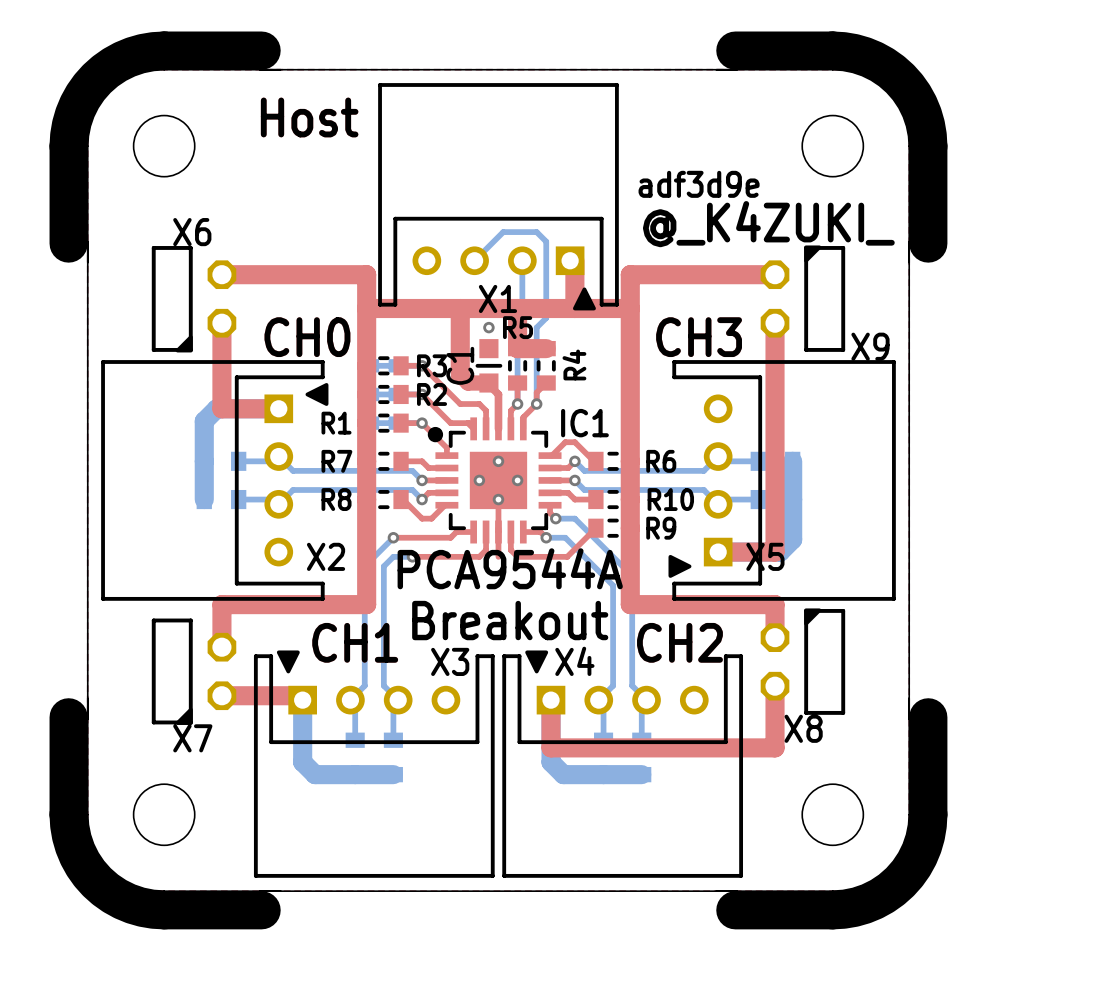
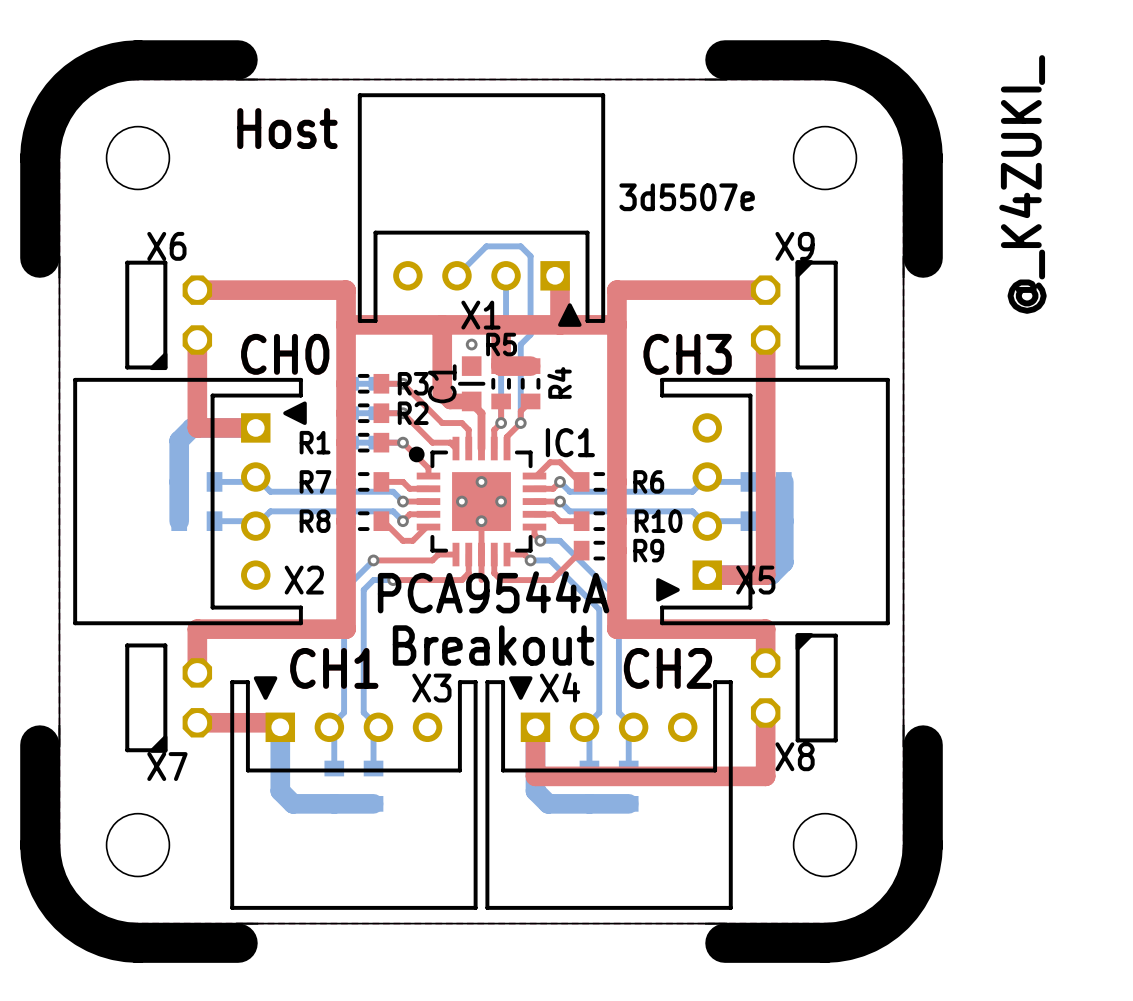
drawing shape: [638, 170, 760, 198] -> [619, 183, 755, 212]
text rotation: 0° (768, 224) -> 90° counterclockwise (1022, 184)
X9 name position: X9 (870, 346) -> X9 (795, 246)

